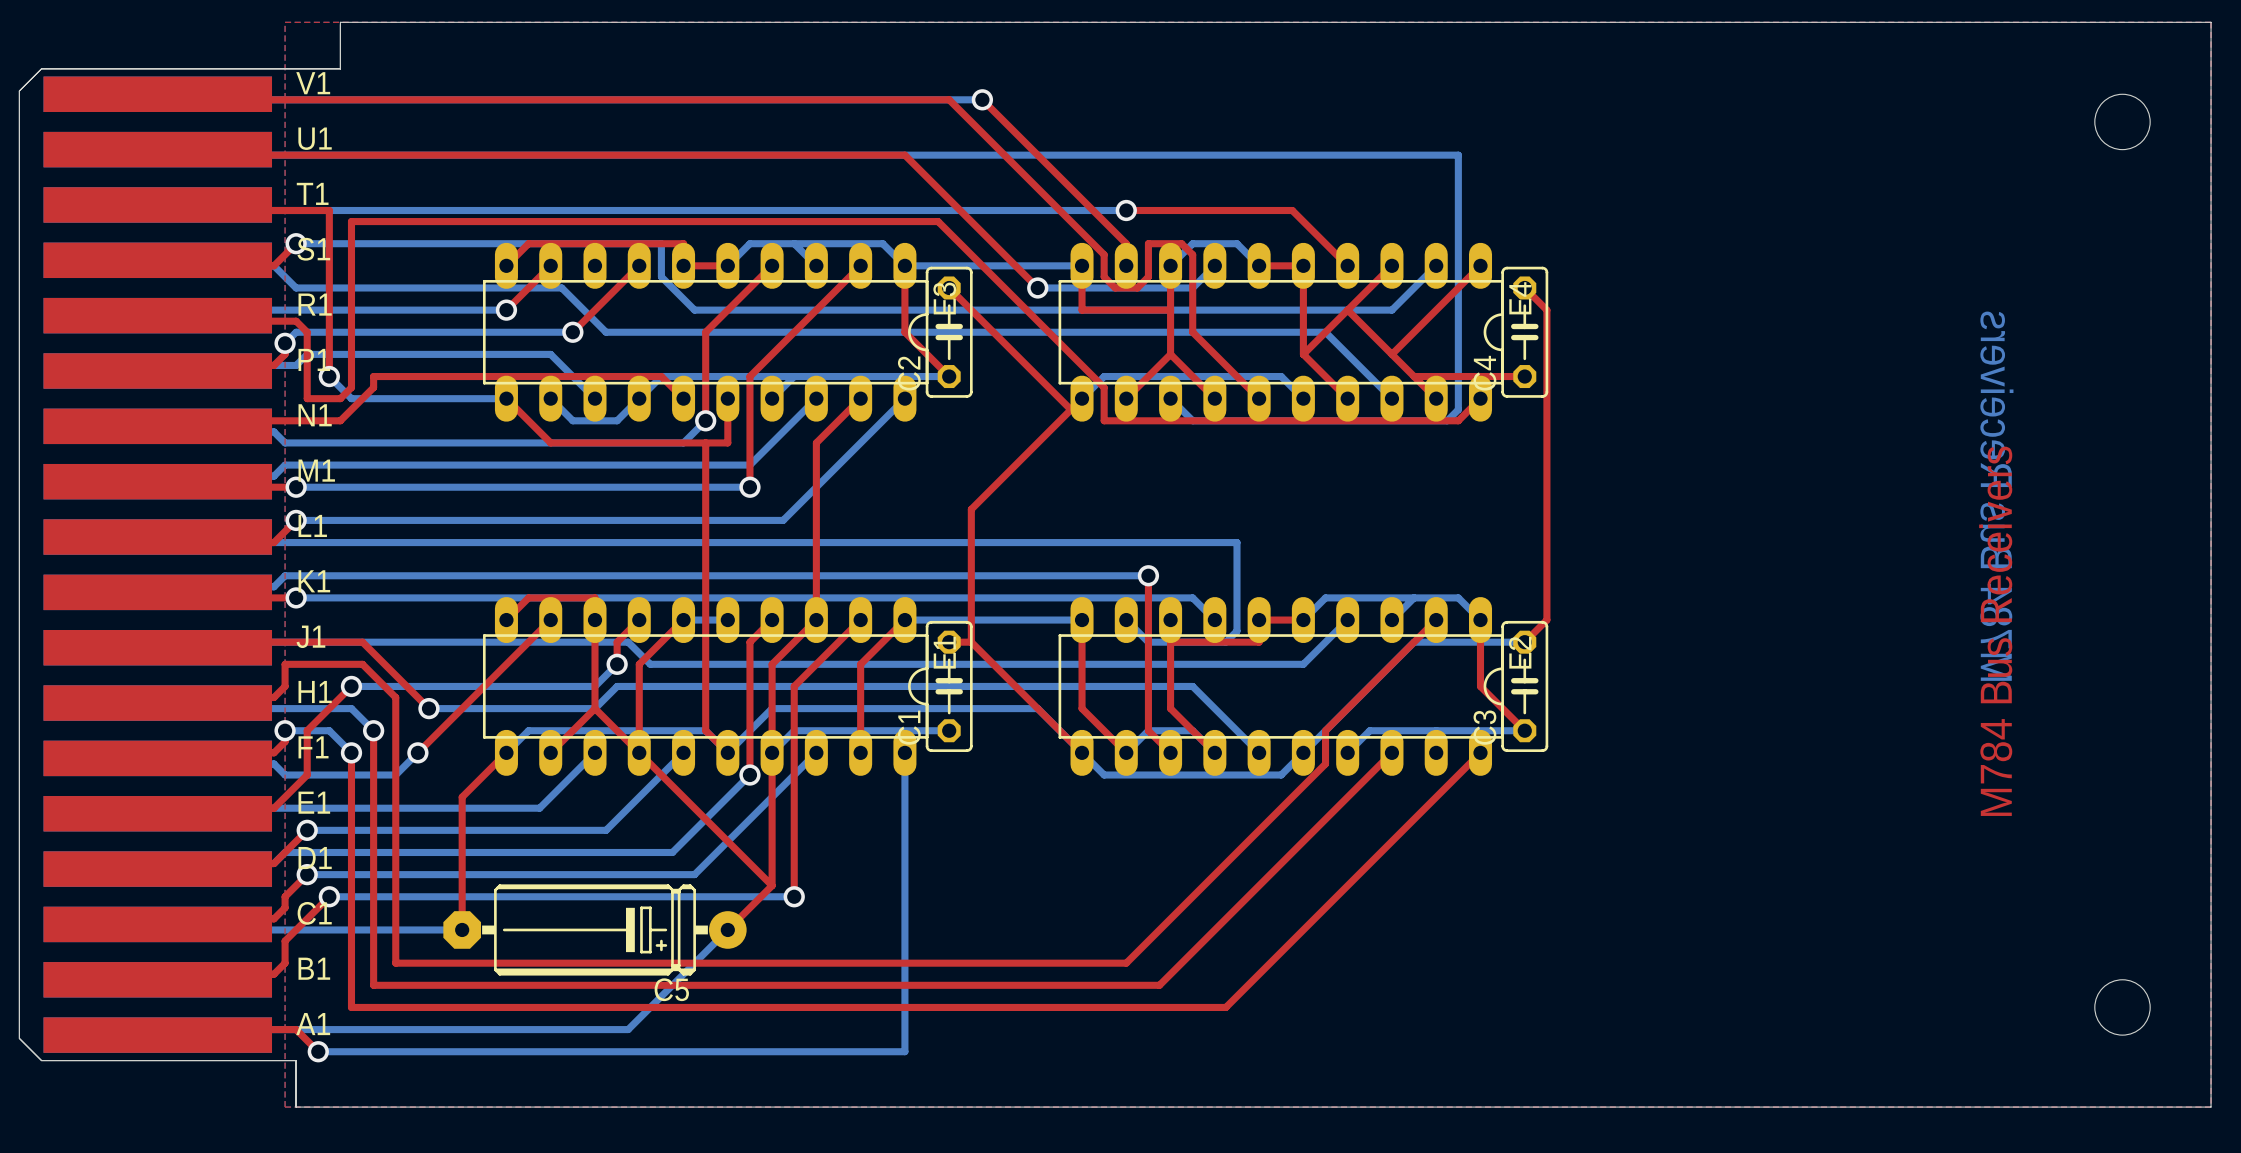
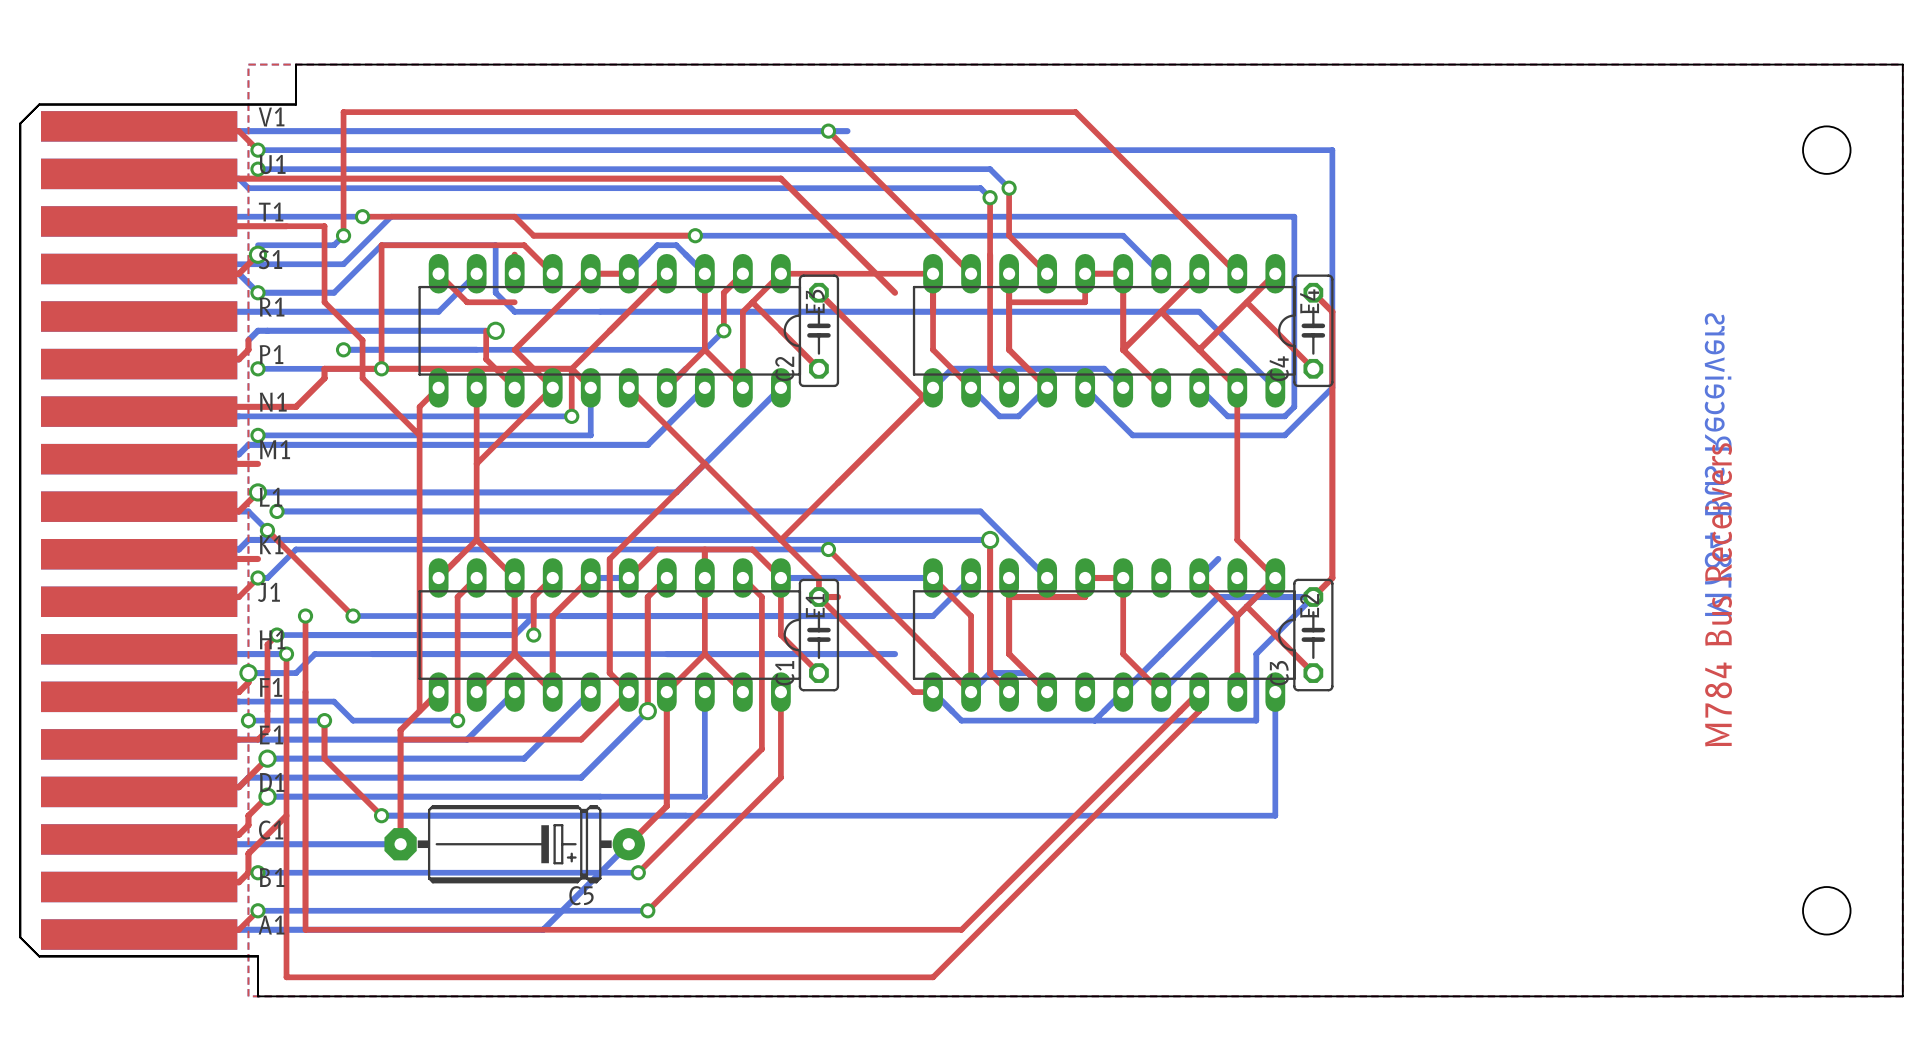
top track: (274, 99) (949, 99) (1104, 254) (1104, 276) (1115, 287) (1137, 287) (1148, 276) -> (238, 131) (257, 150)
via: none -> (828, 131)
top track: (982, 99) (1126, 243) (1126, 265) -> (828, 131) (971, 273)
via: (982, 99) -> none
bottom track: none -> (257, 150) (1332, 150) (1332, 387) (1284, 435) (1132, 435) (1085, 387)
via: none -> (257, 150)
bottom track: none -> (257, 169) (990, 169) (1009, 188)
via: none -> (257, 169)
bottom track: (274, 155) (1458, 155) (1458, 409) (1447, 420) (1192, 420) (1170, 398) -> (238, 178) (248, 188) (980, 188) (990, 197)
top track: none -> (1009, 188) (1009, 235) (1047, 273)
via: none -> (1009, 188)
via: none -> (990, 197)
via: none -> (362, 216)
bottom track: (157, 204) (163, 210) (1126, 210) -> (139, 221) (143, 216) (362, 216)
top track: (329, 210) (329, 376) -> (286, 226) (324, 226) (324, 302) (362, 340) (362, 378) (419, 435)
top track: (1126, 210) (1292, 210) (1347, 265) -> none
via: (1126, 210) -> none
bottom track: none -> (343, 235) (334, 245) (257, 245)
top track: none -> (343, 235) (343, 112) (1075, 112) (1237, 273)
via: none -> (343, 235)
top track: (617, 221) (351, 221) (351, 387) (340, 398) (307, 398) (307, 332) (296, 321) (163, 321) (157, 315) -> (533, 235) (514, 216) (362, 216)
bottom track: none -> (695, 235) (1123, 235) (1161, 273)
top track: (805, 221) (938, 221) (1104, 387) (1104, 420) (1458, 420) (1480, 398) -> none
via: none -> (695, 235)
bottom track: (296, 243) (661, 243) (661, 276) (694, 310) -> (334, 292) (381, 245) (495, 245) (495, 292) (514, 311) (600, 311)
bottom track: (749, 243) (882, 243) (904, 265) (1082, 265) -> (647, 254) (657, 245) (676, 245) (685, 254)
top track: (1148, 243) (1181, 243) (1192, 254) (1192, 332) (1259, 398) -> (990, 254) (990, 197)
top track: (506, 265) (528, 243) (683, 243) (683, 265) -> (438, 273) (467, 302) (514, 302)
bottom track: none -> (476, 273) (438, 311)
top track: (550, 265) (506, 310) -> (704, 349) (666, 387)
top track: (639, 265) (572, 332) -> (552, 273) (524, 245) (381, 245) (381, 368)
top track: none -> (590, 273) (514, 349) (552, 387) (476, 463)
top track: none -> (704, 273) (704, 349)
top track: (904, 265) (904, 332) -> (752, 302) (780, 330)
top track: none -> (933, 273) (780, 273) (742, 311) (742, 387) (704, 349)
bottom track: (1170, 265) (1192, 243) (1236, 243) (1259, 265) -> none
bottom track: (1214, 265) (1192, 287) (1037, 287) -> none
top track: none -> (1085, 273) (1085, 302) (1009, 302)
bottom track: (1436, 265) (1391, 310) -> (1275, 387) (1199, 311)
top track: none -> (990, 283) (990, 368) (1009, 387)
via: none -> (257, 292)
bottom track: (384, 287) (561, 287) (606, 332) (1325, 332) (1391, 398) -> (139, 268) (143, 264) (343, 264) (391, 216) (1294, 216) (1294, 406) (1284, 416) (1227, 416) (1199, 387)
top track: (838, 287) (749, 376) (749, 487) -> (723, 292) (723, 330)
via: (1037, 287) -> none
via: (506, 310) -> none
top track: (1082, 310) (1170, 310) -> (933, 311) (933, 349) (971, 387)
top track: none -> (486, 330) (486, 359) (514, 387)
top track: (705, 332) (705, 420) -> (609, 330) (571, 368) (571, 416)
via: none -> (723, 330)
via: (285, 343) -> none
bottom track: (395, 354) (307, 354) (296, 365) (274, 365) -> none
via: none -> (343, 349)
bottom track: (550, 354) (595, 398) -> (476, 349) (704, 349) (723, 330)
top track: (1170, 354) (1126, 398) -> none
bottom track: none -> (257, 368) (381, 368)
via: none -> (257, 368)
bottom track: (329, 376) (351, 398) (506, 398) -> none
via: (329, 376) -> none
via: none -> (381, 368)
bottom track: (949, 376) (661, 376) (617, 420) (572, 420) (550, 398) -> none
top track: (1414, 376) (1524, 376) -> (1246, 302) (1313, 368)
top track: (506, 398) (550, 442) (727, 442) (727, 398) -> (438, 387) (419, 406) (419, 711)
top track: none -> (476, 387) (476, 539)
bottom track: none -> (590, 387) (590, 435) (257, 435)
top track: none -> (628, 387) (818, 578) (818, 597) (914, 692) (933, 692)
top track: (860, 398) (816, 442) (816, 586) -> none
bottom track: none -> (971, 387) (999, 416) (1018, 416) (1047, 387)
top track: none -> (1237, 387) (1237, 539) (1275, 578) (1237, 616)
bottom track: (705, 420) (683, 442) (285, 442) (274, 431) -> (571, 416) (238, 416)
via: (705, 420) -> none
via: none -> (571, 416)
top track: (705, 442) (705, 597) -> (704, 463) (609, 558)
via: none -> (257, 435)
bottom track: (296, 487) (749, 487) -> none
via: (296, 487) -> none
via: (749, 487) -> none
top track: (971, 509) (971, 642) (1082, 752) -> (837, 482) (780, 539)
bottom track: (285, 542) (318, 542) -> (248, 511) (267, 530)
via: none -> (276, 511)
bottom track: (1137, 542) (1236, 542) (1236, 631) (1225, 642) (1148, 642) (1126, 620) -> (980, 511) (1028, 558)
top track: none -> (267, 530) (353, 616)
via: none -> (267, 530)
top track: none -> (476, 539) (457, 558)
bottom track: none -> (828, 549) (296, 549) (267, 578) (257, 578)
top track: none -> (828, 549) (933, 654)
via: none -> (828, 549)
bottom track: (296, 597) (1192, 597) -> none
via: (296, 597) -> none
top track: (528, 597) (595, 597) (595, 620) -> (476, 539) (514, 578)
via: none -> (257, 578)
top track: none -> (628, 578) (657, 549) (752, 549) (780, 578) (780, 635) (818, 673)
top track: (816, 620) (772, 664) (772, 752) -> (704, 578) (704, 654)
top track: (860, 620) (794, 686) (794, 896) -> (742, 578) (761, 597) (761, 749) (638, 872)
top track: (904, 620) (860, 664) (860, 752) -> (704, 654) (742, 692)
top track: (1082, 620) (1082, 708) -> (933, 578) (971, 616) (971, 692)
bottom track: (1303, 620) (1325, 597) (1458, 597) (1480, 620) -> none
top track: none -> (1123, 578) (1123, 654) (1161, 692)
bottom track: (1347, 620) (1303, 664) (1082, 664) -> (971, 578) (933, 616)
top track: none -> (1199, 578) (1237, 616)
top track: (1436, 620) (1325, 730) (1325, 763) (1126, 963) (395, 963) (395, 697) (362, 664) (285, 664) (285, 686) (274, 697) (163, 697) (157, 703) -> none
top track: (1480, 620) (1480, 686) -> (1246, 606) (1275, 635)
top track: (274, 642) (362, 642) (428, 708) -> (238, 597) (257, 578)
top track: (528, 642) (417, 752) -> (457, 597) (457, 720)
bottom track: none -> (1313, 597) (1256, 654) (1256, 720) (961, 720) (952, 711)
bottom track: (157, 647) (163, 642) (628, 642) (650, 664) -> (353, 616) (562, 616)
top track: none -> (305, 616) (305, 692)
via: none -> (305, 616)
via: none -> (353, 616)
top track: none -> (533, 616) (533, 635)
via: (617, 664) -> none
top track: none -> (1237, 616) (1237, 692)
bottom track: none -> (276, 635) (305, 635)
via: none -> (276, 635)
top track: (351, 686) (307, 730) -> (276, 635) (267, 644) (267, 673)
via: (351, 686) -> none
via: none -> (533, 635)
bottom track: (329, 708) (351, 708) (373, 730) -> none
top track: none -> (286, 654) (286, 977) (933, 977) (1199, 711) (1199, 692)
via: none -> (286, 654)
via: (428, 708) -> none
bottom track: (595, 708) (617, 686) (1192, 686) (1259, 752) -> none
bottom track: (772, 708) (727, 752) (705, 730) (528, 730) (506, 752) -> (666, 654) (514, 654)
top track: none -> (704, 654) (666, 692)
bottom track: (329, 730) (351, 752) -> (286, 673) (296, 673) (315, 654) (372, 654)
top track: (373, 730) (373, 786) -> none
via: (373, 730) -> none
bottom track: (949, 730) (794, 730) (772, 752) -> none
bottom track: (1369, 730) (1524, 730) -> (1180, 673) (1275, 578)
via: (351, 752) -> none
bottom track: (417, 752) (395, 775) (285, 775) (274, 763) -> (457, 720) (353, 720) (334, 701) (238, 701)
via: (417, 752) -> none
top track: (639, 752) (772, 885) -> none
top track: none -> (628, 692) (581, 739) (400, 739)
bottom track: (816, 752) (694, 874) -> (704, 692) (704, 796) (600, 796)
bottom track: (904, 752) (904, 1051) (318, 1051) -> none
top track: none -> (780, 692) (780, 777) (647, 910)
bottom track: none -> (1275, 692) (1275, 815) (685, 815)
top track: (1480, 752) (1225, 1007) (351, 1007) -> none
top track: (307, 775) (274, 808) -> (267, 711) (267, 730) (257, 739) (238, 739)
bottom track: (1104, 775) (1281, 775) -> (1094, 720) (1104, 711)
bottom track: none -> (248, 720) (324, 720)
via: none -> (248, 720)
via: none -> (324, 720)
via: none -> (457, 720)
top track: (373, 830) (373, 985) (1159, 985) -> (305, 910) (305, 929) (961, 929) (999, 891)
top track: none -> (324, 758) (381, 815)
bottom track: (329, 896) (440, 896) -> none
via: (329, 896) -> none
via: none -> (381, 815)
via: (794, 896) -> none
bottom track: none -> (257, 872) (638, 872)
via: none -> (257, 872)
via: none -> (638, 872)
bottom track: none -> (257, 910) (647, 910)
via: none -> (257, 910)
via: none -> (647, 910)
top track: (274, 1029) (296, 1029) (318, 1051) -> (238, 929) (257, 910)
via: (318, 1051) -> none

